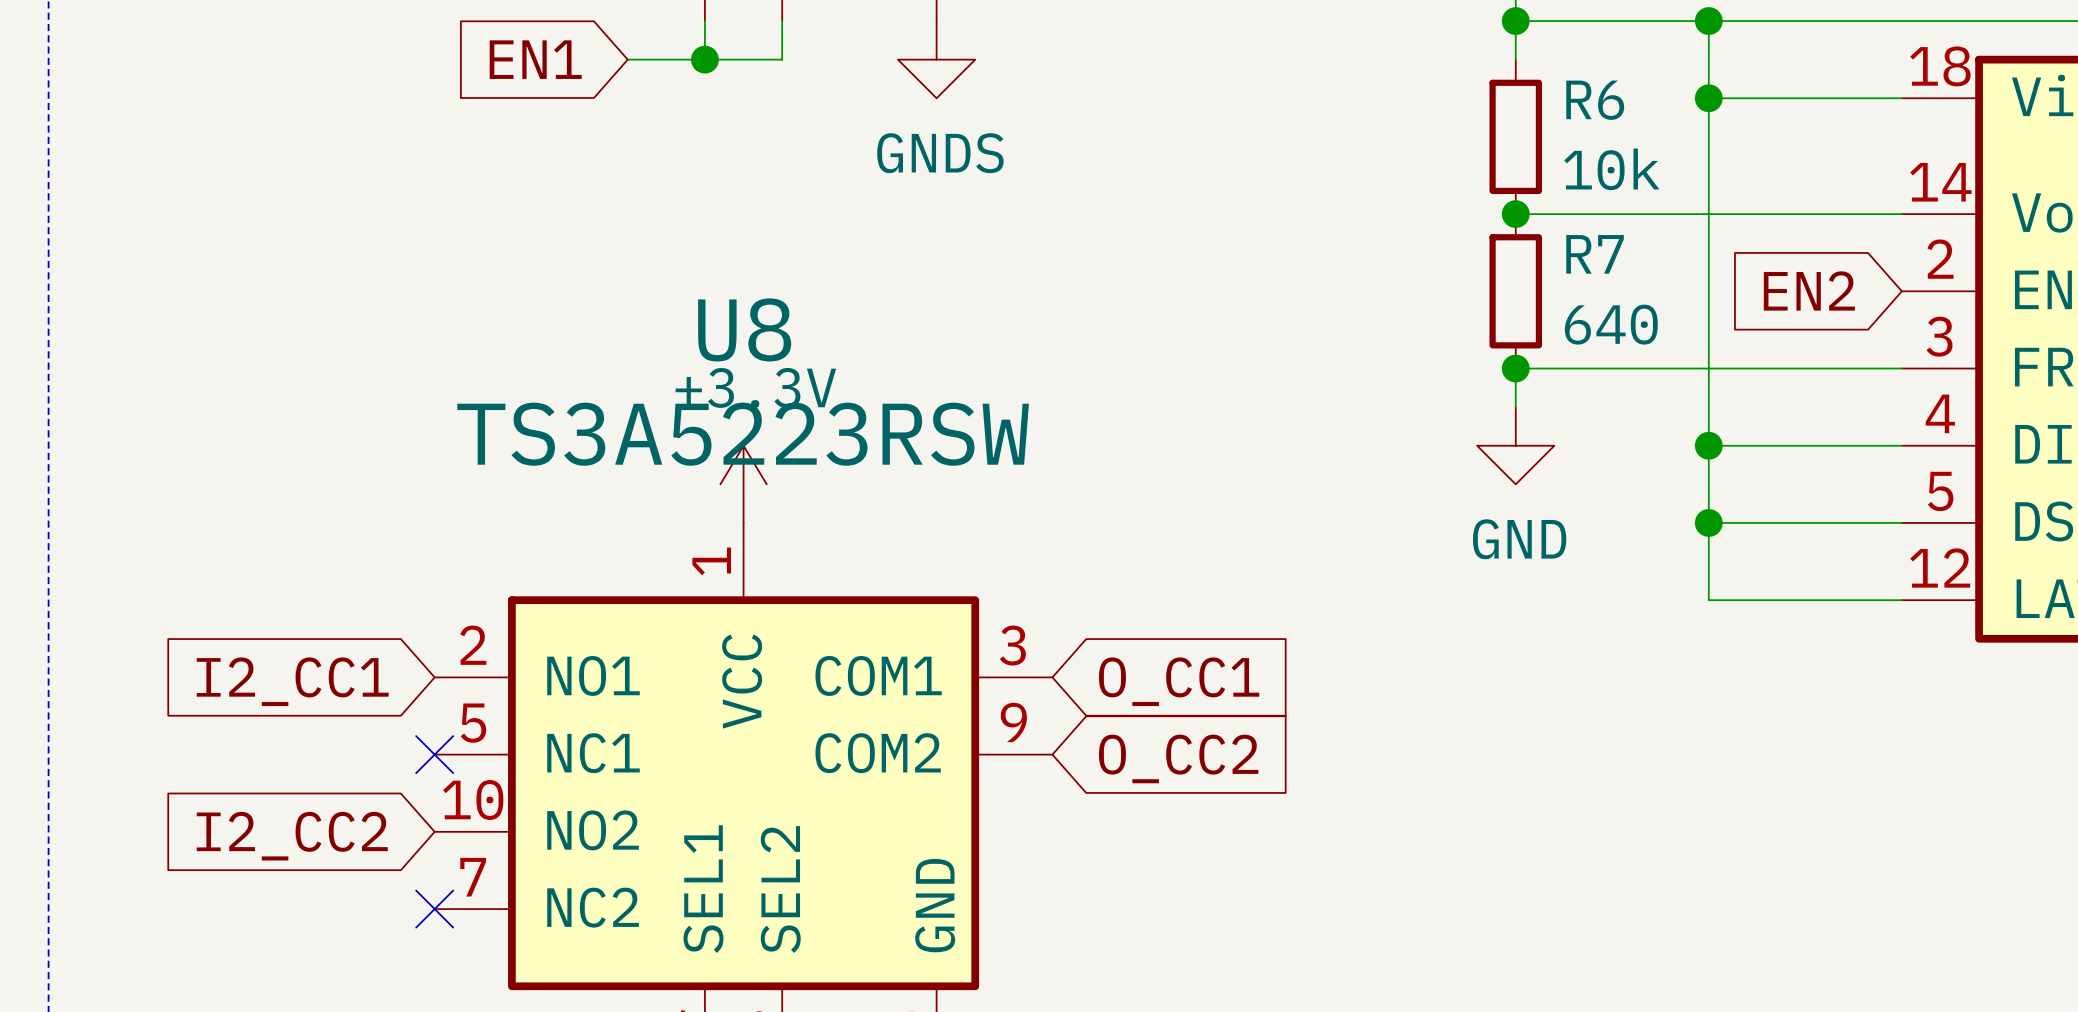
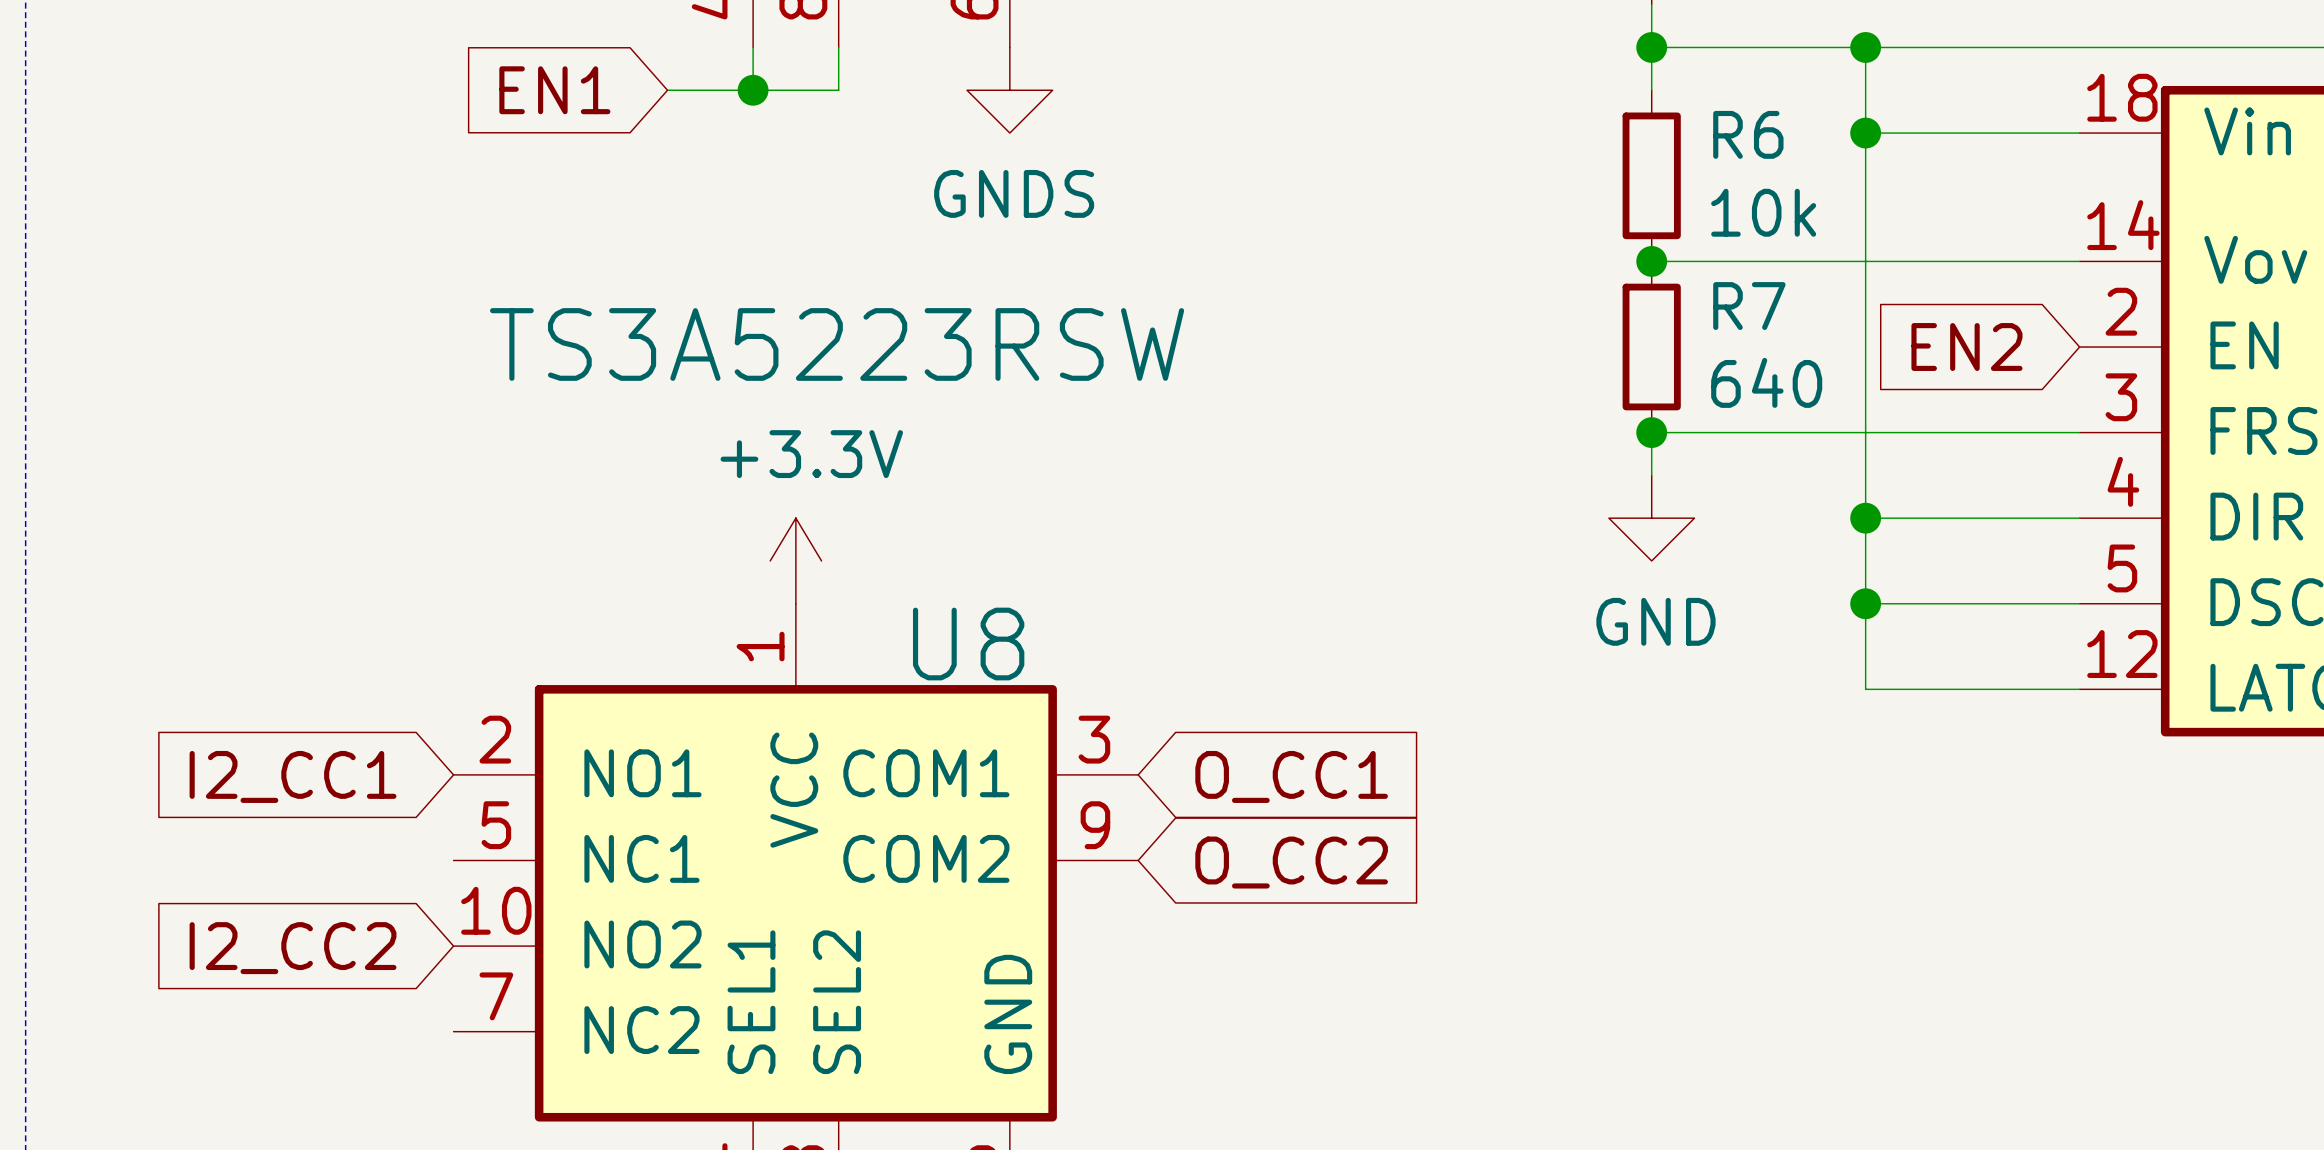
U8 name position: U8 (744, 329) -> U8 (968, 644)
U8 value position: TS3A5223RSW (743, 434) -> TS3A5223RSW (837, 344)
no-connect mark: (434, 754) -> none
no-connect mark: (434, 909) -> none

